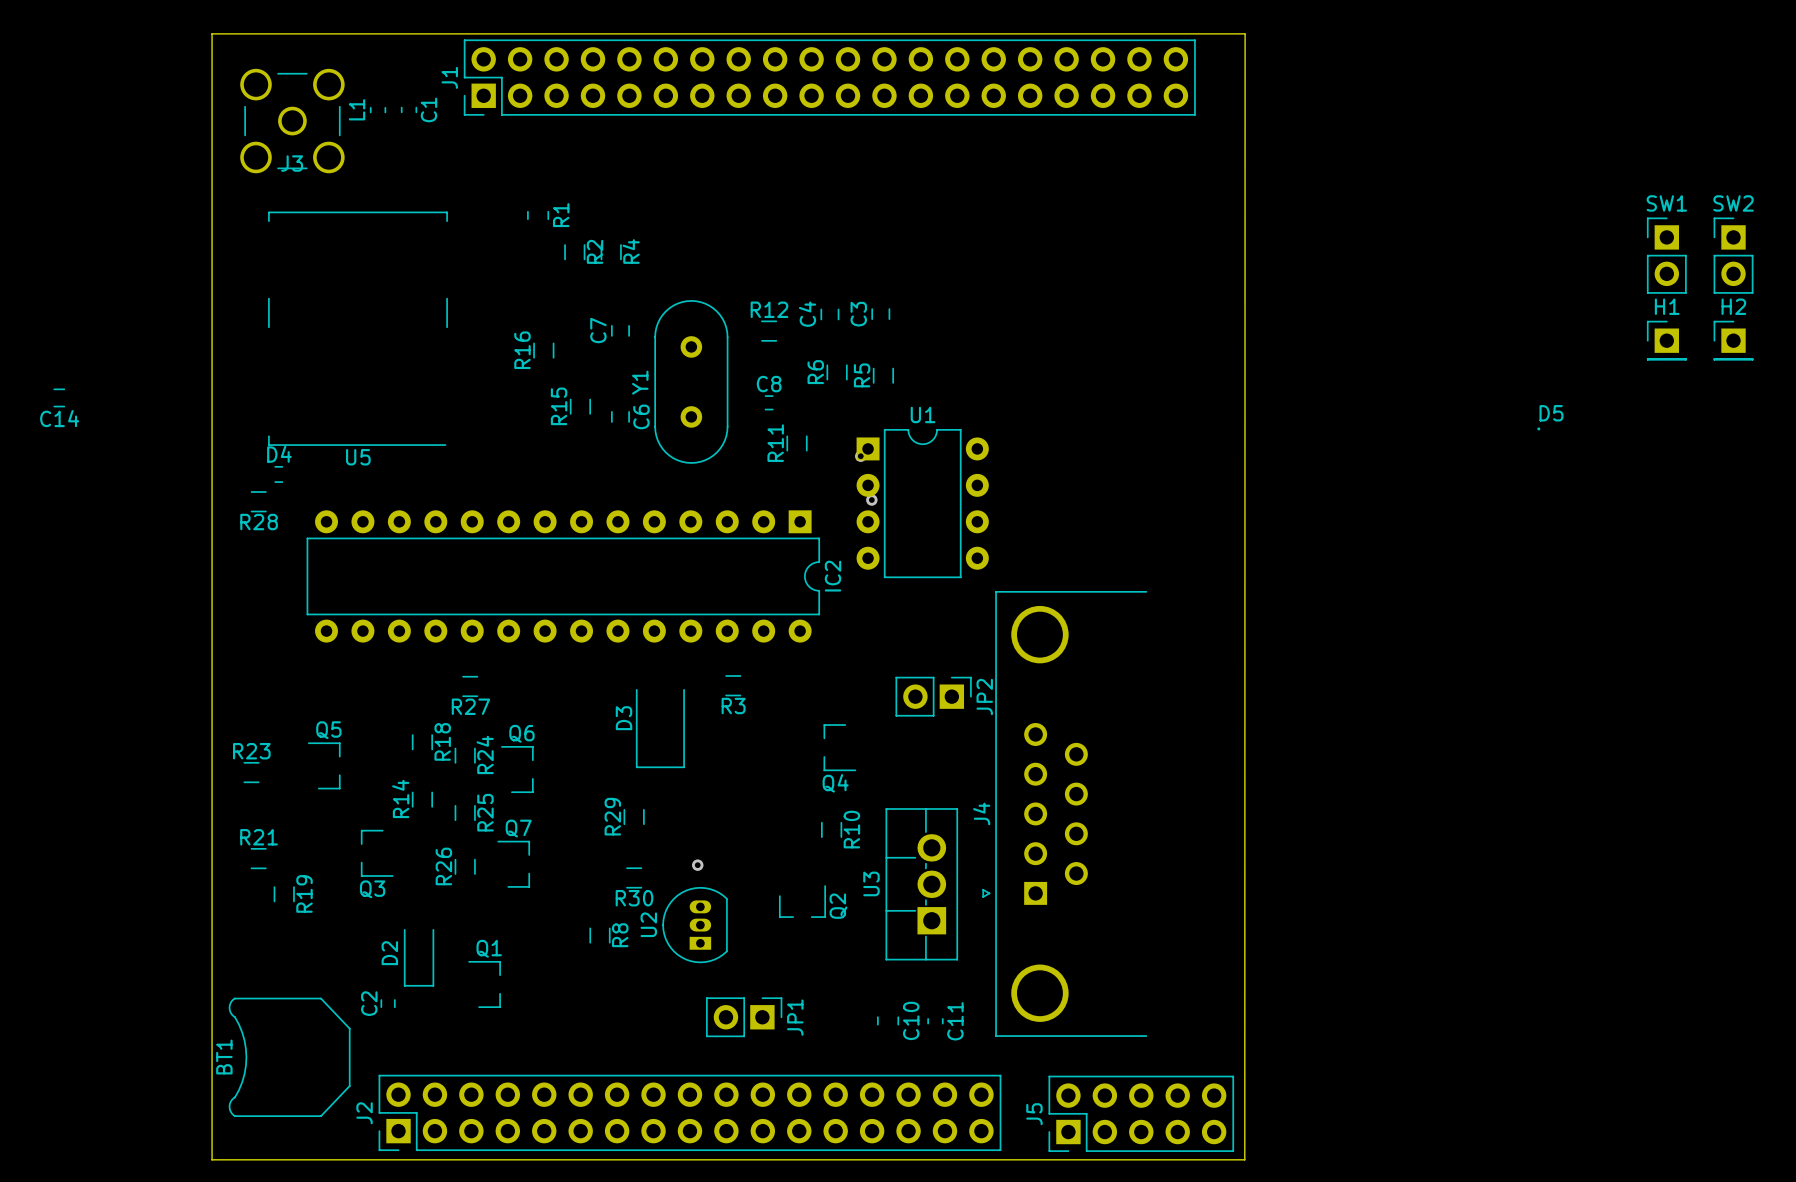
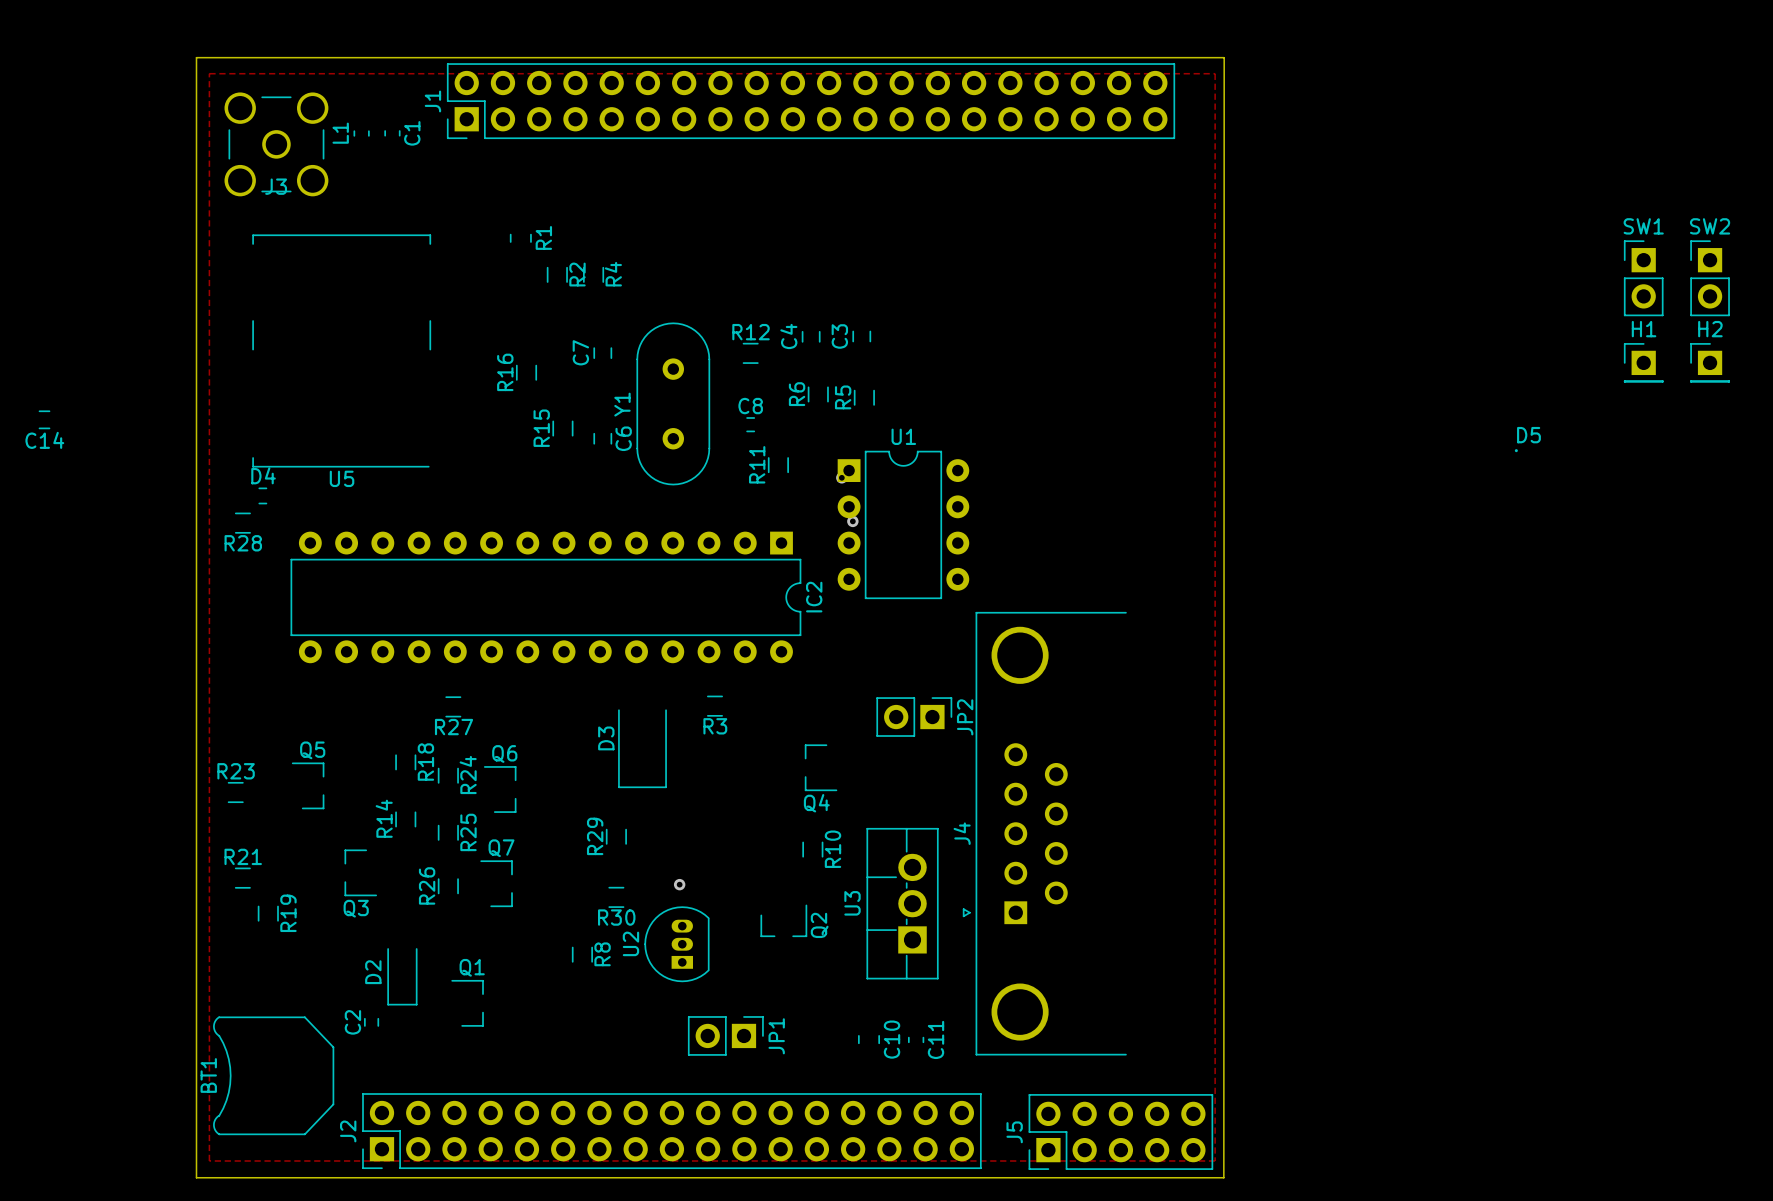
zone outline: none -> (209, 73) (209, 1160) (1215, 1160) (1215, 73) (209, 73)

